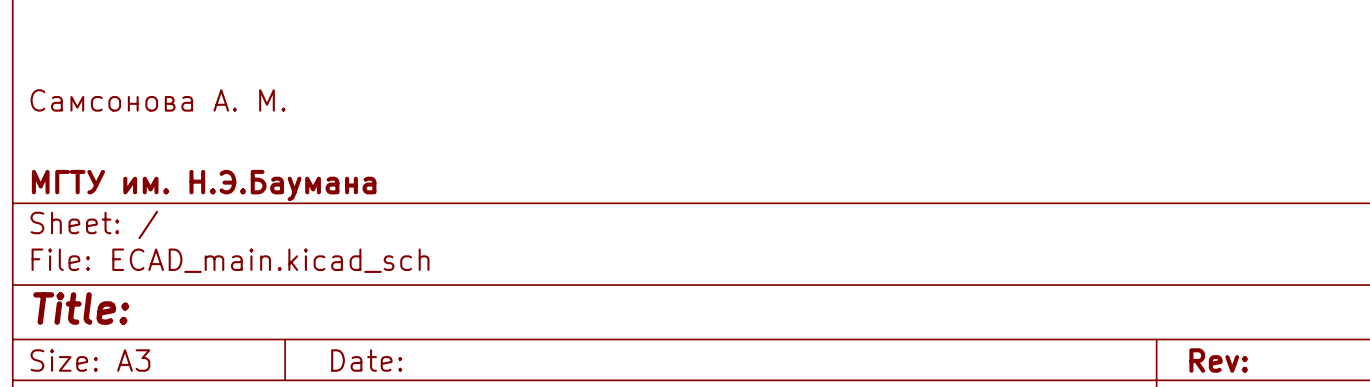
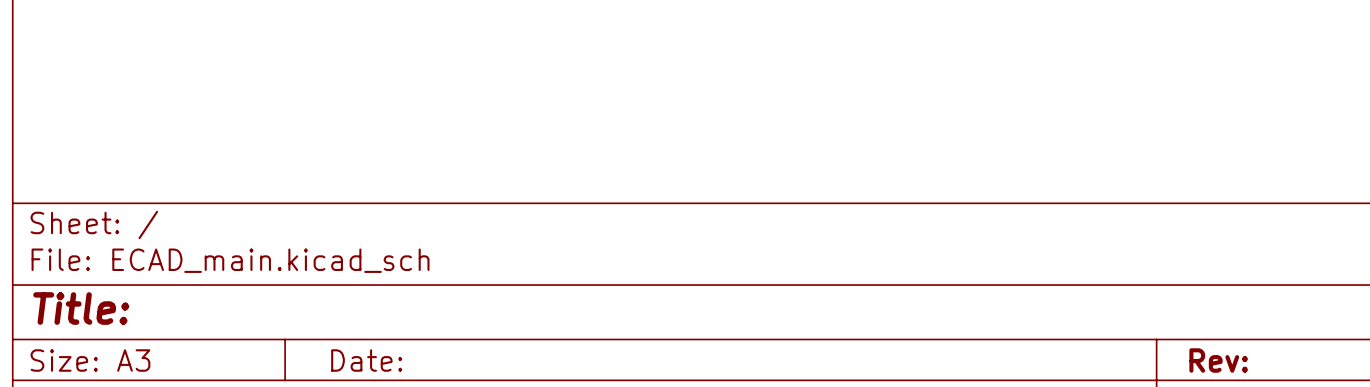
title block: Самсонова А. М. (158, 100) -> none
title block: МГТУ им. Н.Э.Баумана (204, 185) -> none

